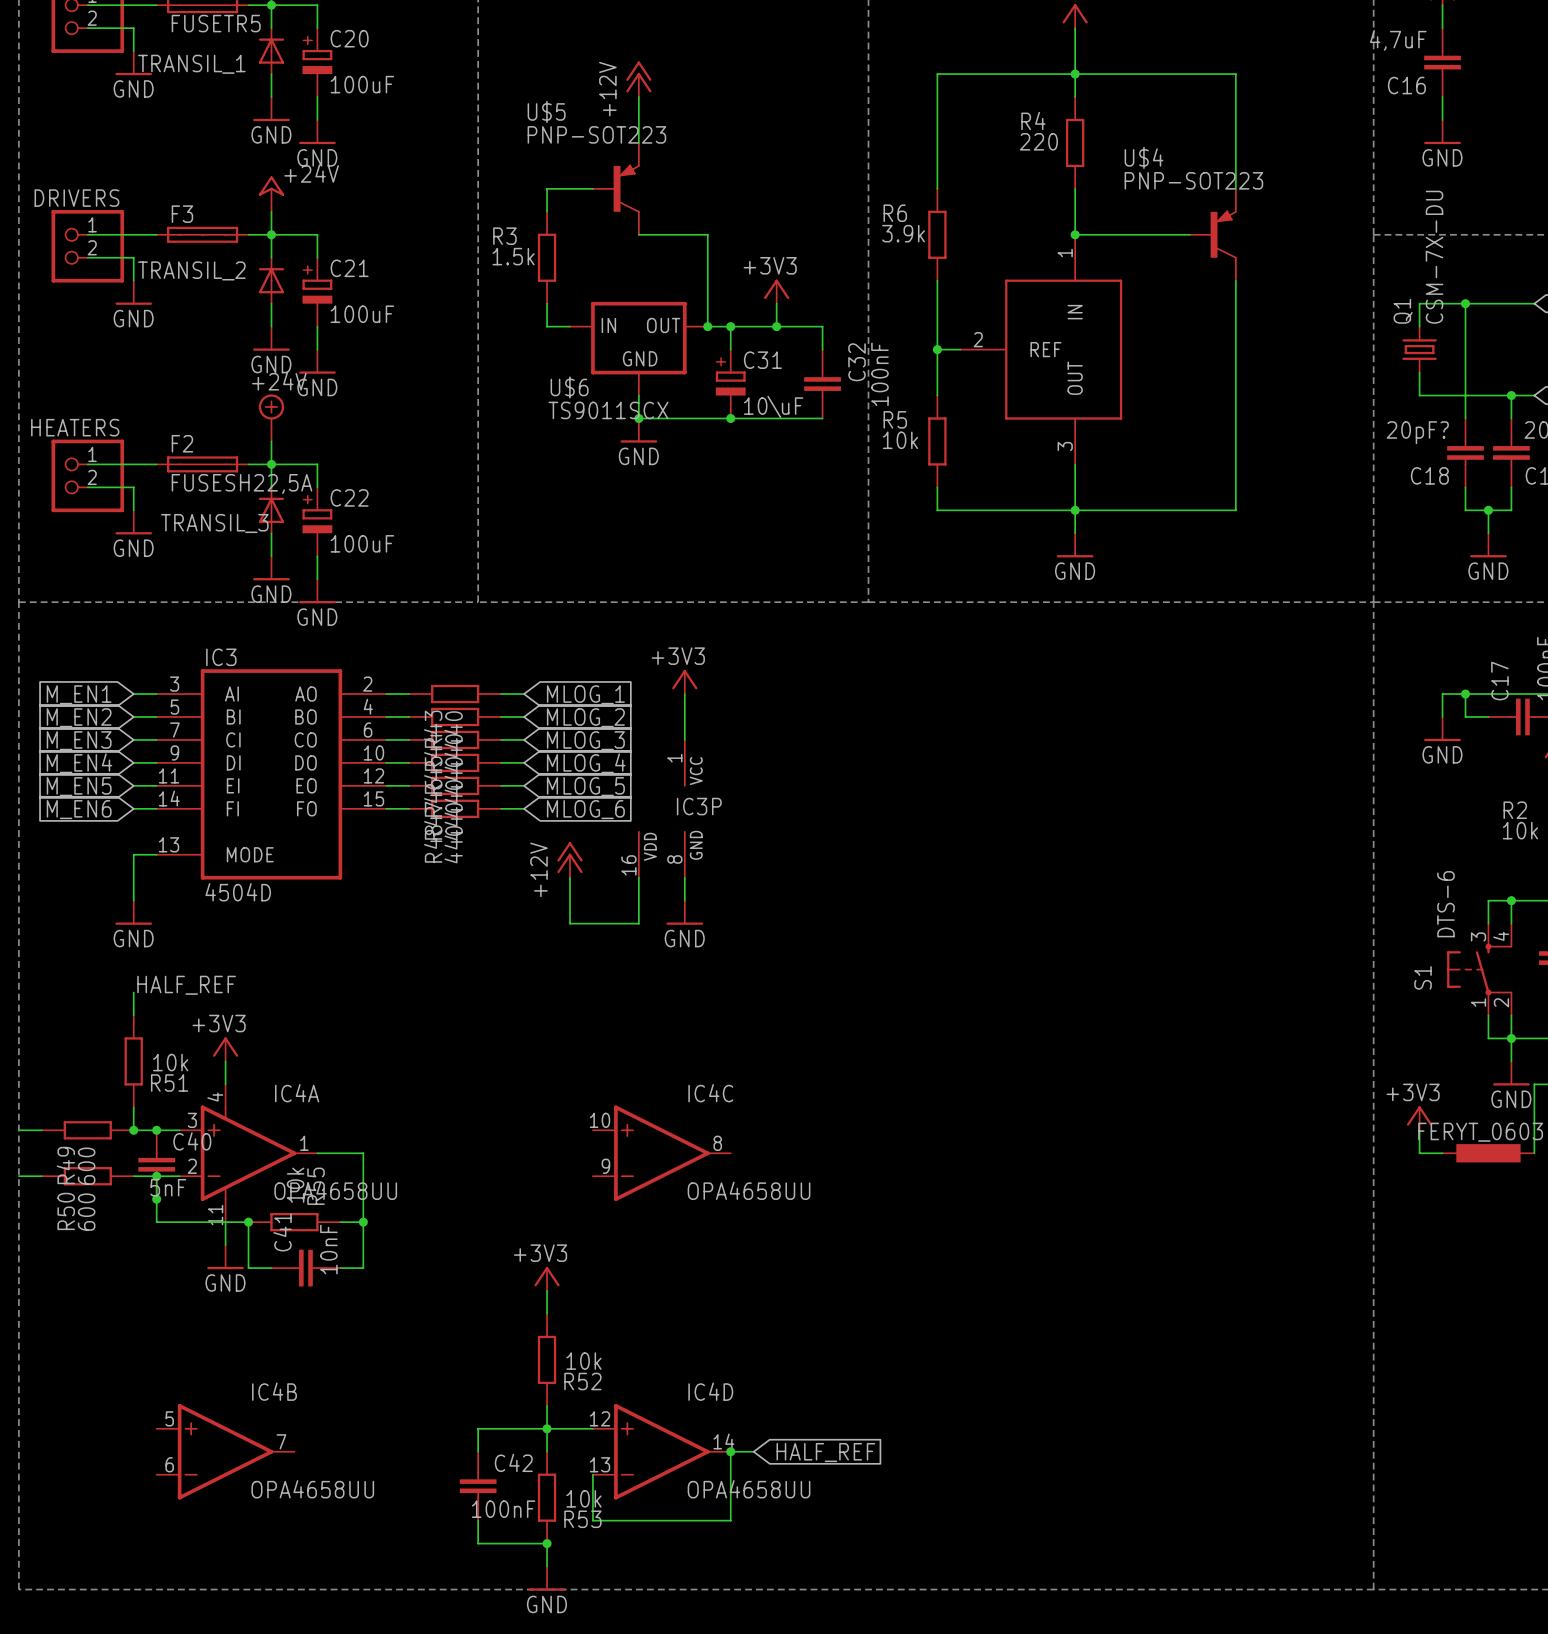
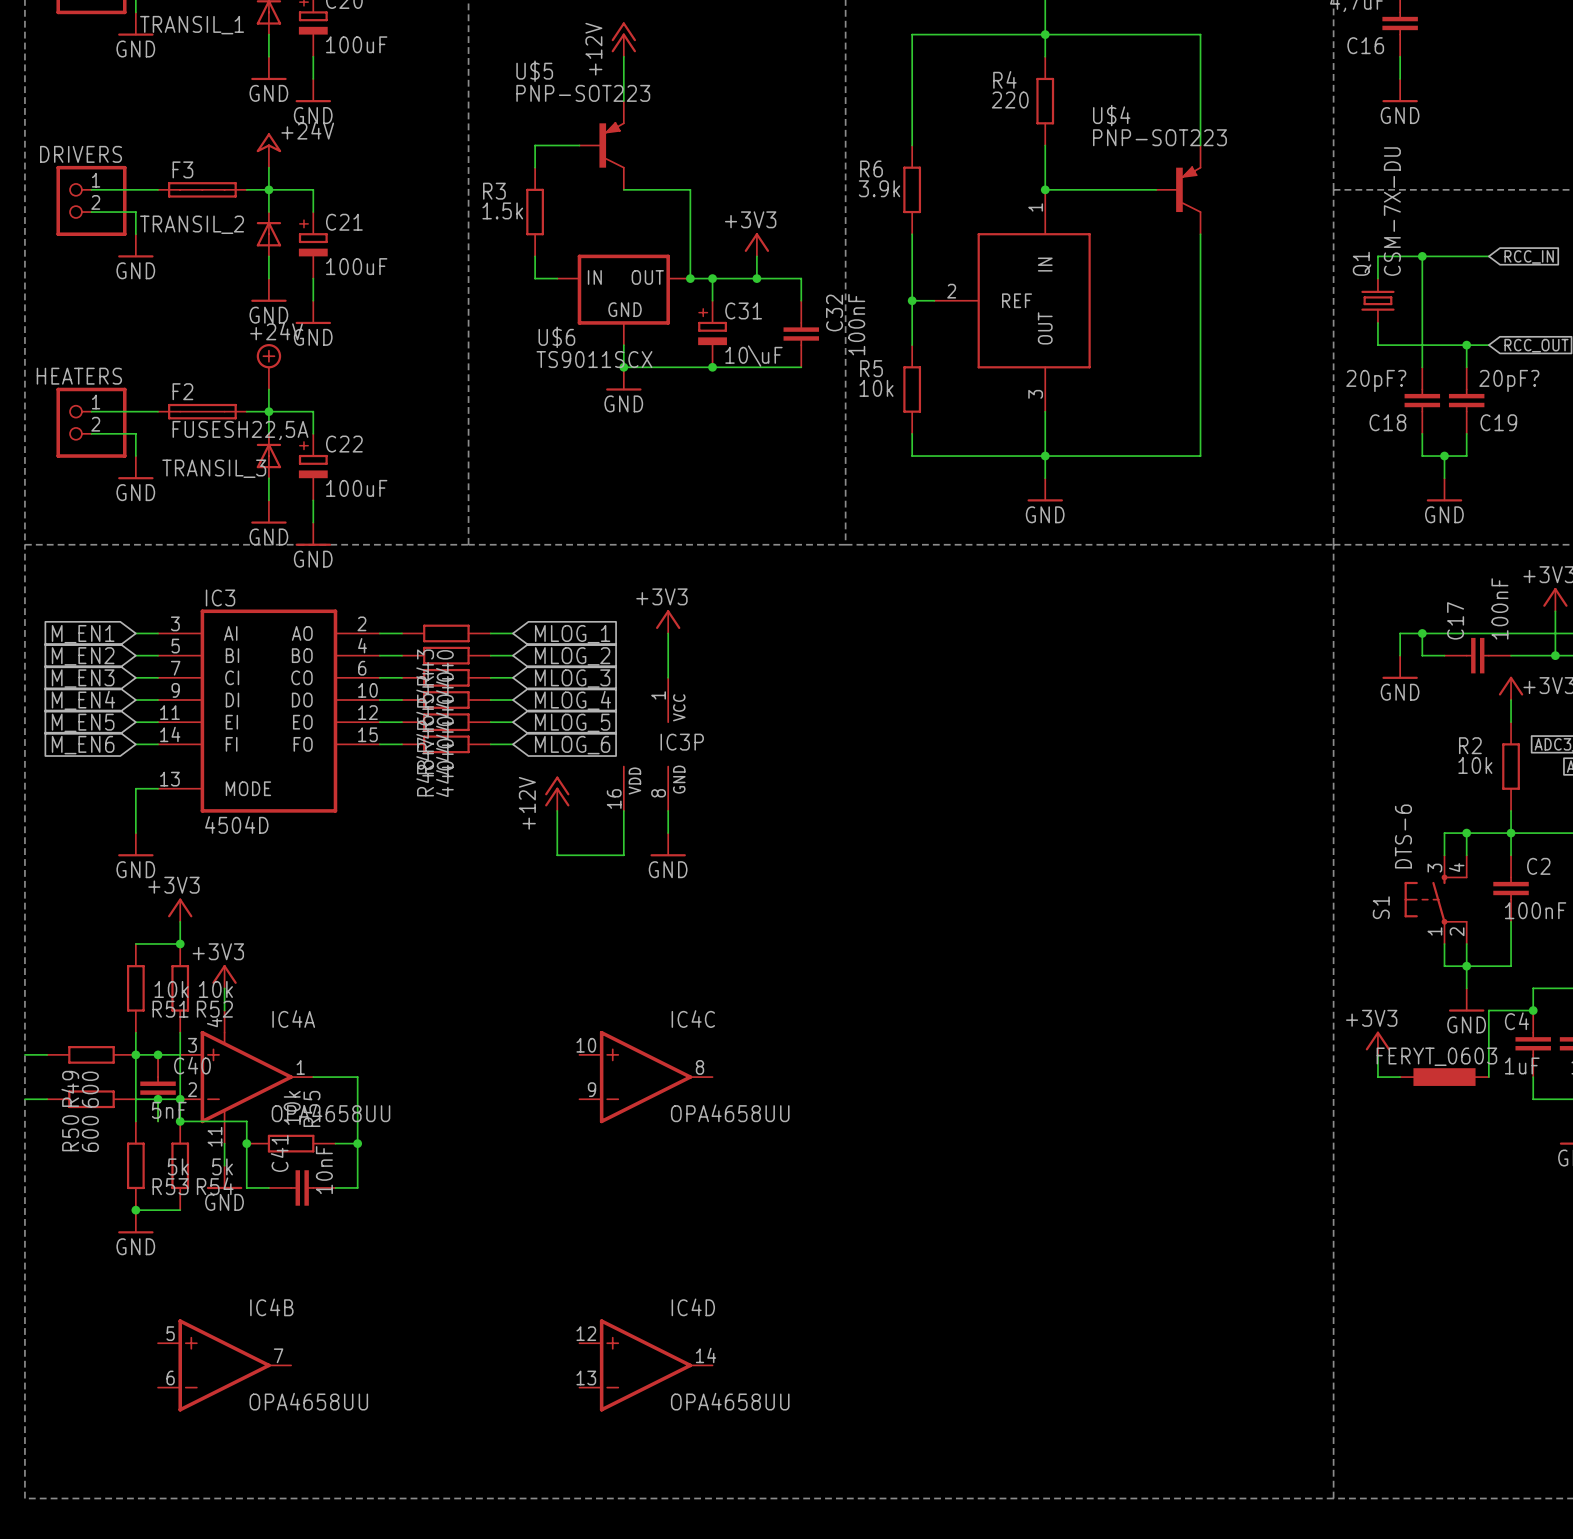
power symbol: none -> +3V3 (180, 910)
label: HALF_REF (186, 985) -> none
wire: (133, 992) (133, 1015) -> (180, 921) (180, 943) (135, 943)
junction: none -> (180, 943)
wire: none -> (135, 1054) (135, 1121)
junction: none -> (180, 1099)
wire: (156, 1199) (156, 1222) (248, 1222) -> (180, 1032) (180, 1121) (246, 1121) (246, 1143)
junction: (156, 1199) -> none
junction: none -> (180, 1121)
R54: none -> 5k (180, 1165)
power symbol: +3V3 (547, 1278) -> none
wire: none -> (135, 1210) (180, 1210)
junction: none -> (135, 1210)
wire: (547, 1291) (547, 1313) -> none
power symbol: none -> GND (135, 1221)
R52 position: (547, 1359) -> (180, 988)
wire: (547, 1405) (547, 1451) -> none
junction: (547, 1428) -> none
wire: (592, 1428) (478, 1428) (478, 1451) -> none
junction: (730, 1451) -> none
wire: (753, 1451) (730, 1451) (730, 1520) (592, 1520) (592, 1474) -> none
global label: HALF_REF (825, 1452) -> none
C42: 100nF (478, 1486) -> none
R53 position: (547, 1497) -> (135, 1165)
R53 value: 10k (583, 1498) -> 5k (178, 1166)
wire: (478, 1520) (478, 1543) (547, 1543) (547, 1566) -> none
junction: (547, 1543) -> none
power symbol: GND (547, 1578) -> none

